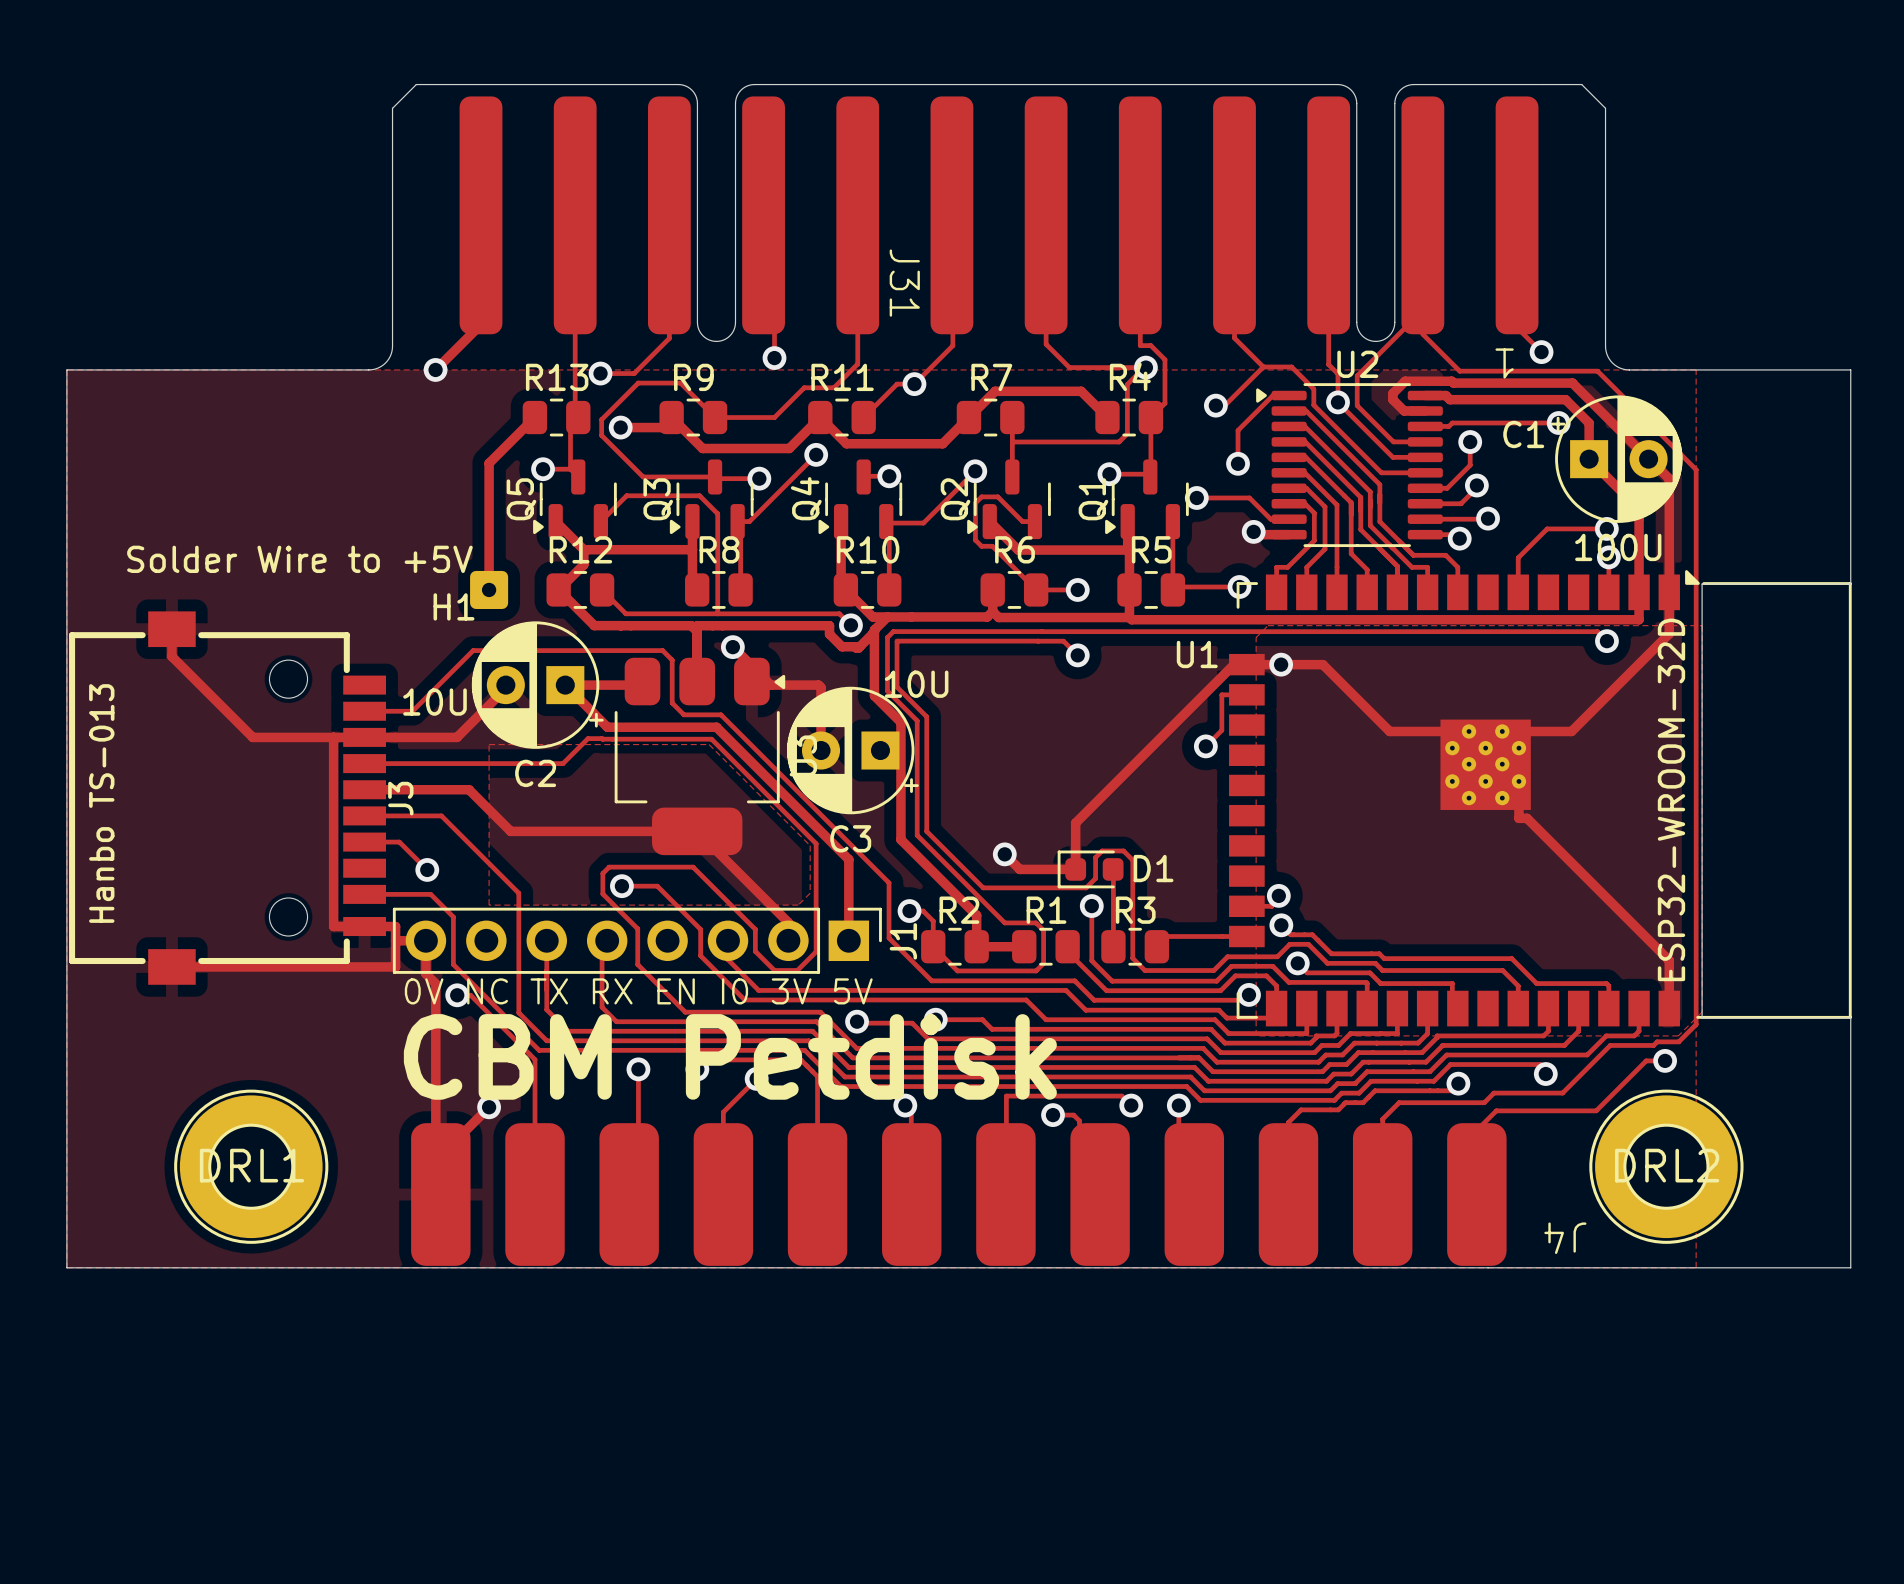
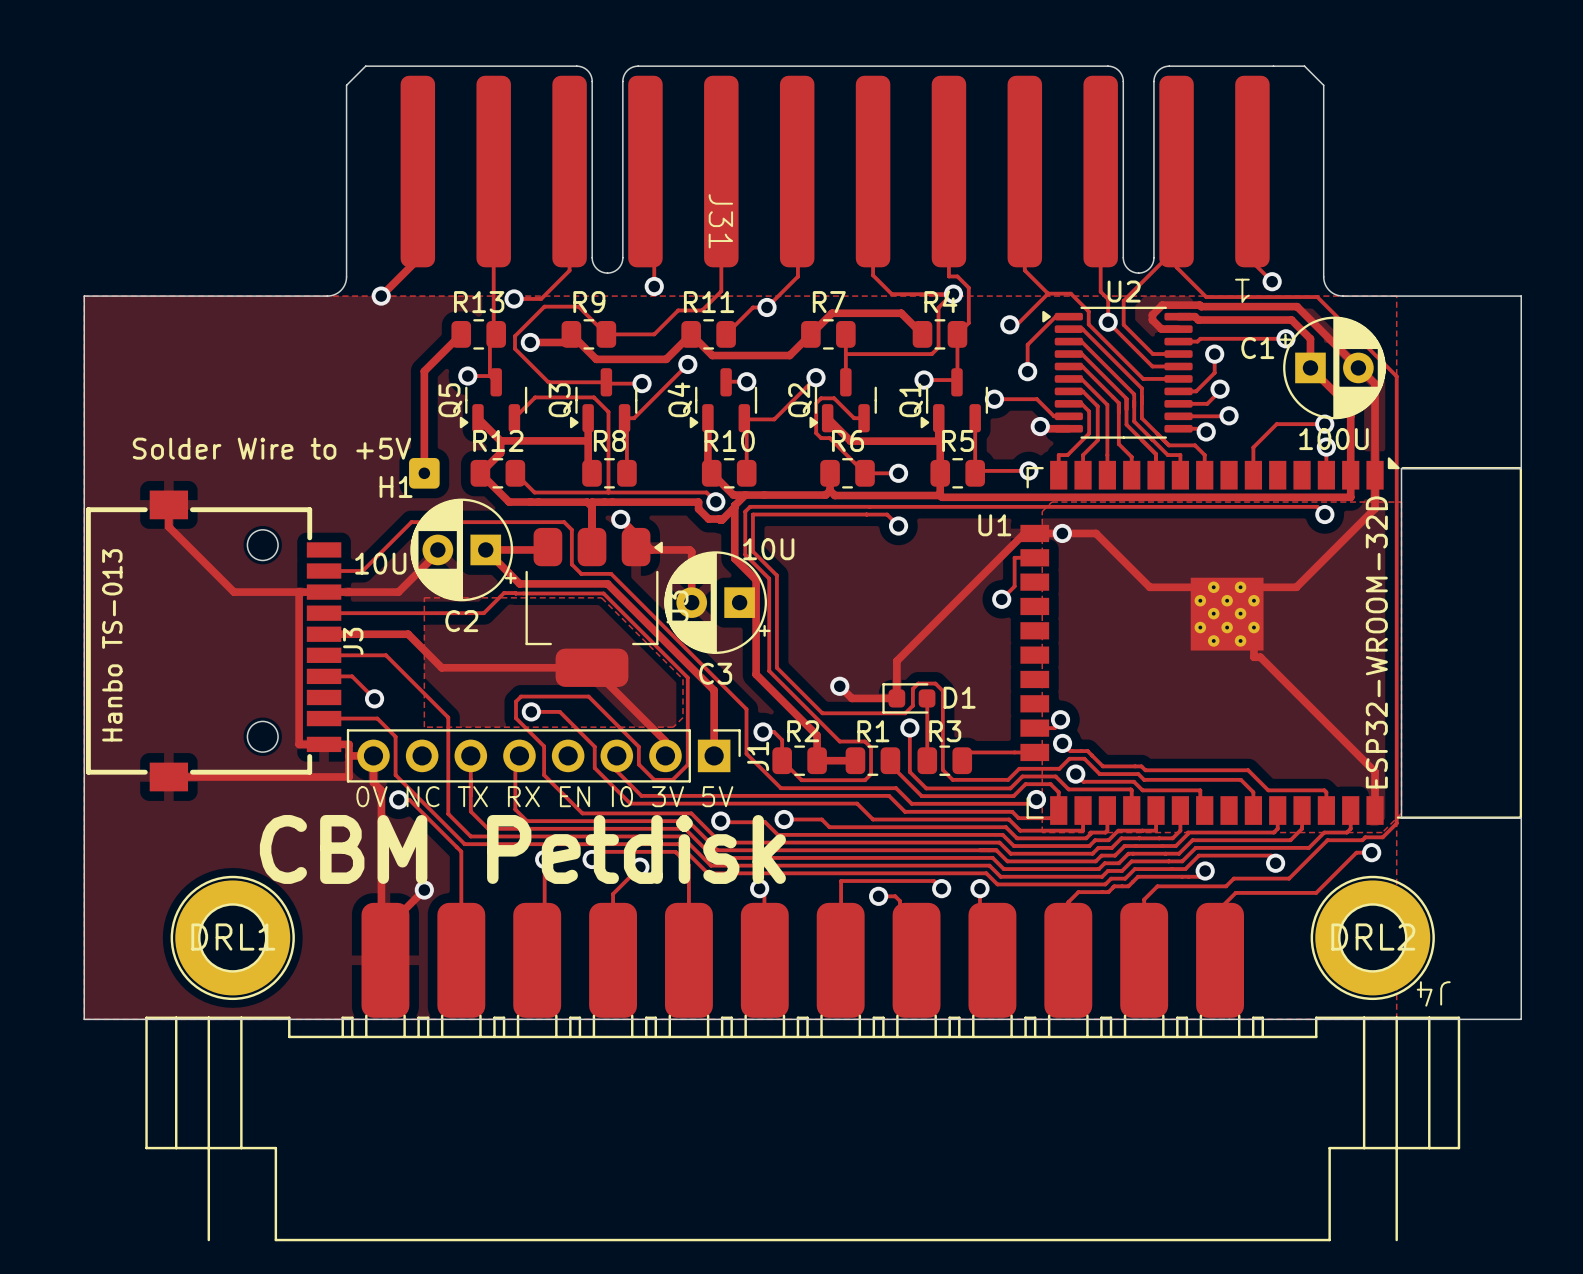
J31 name position: J31 (904, 283) -> J31 (720, 221)
text position: CBM Petdisk (730, 1056) -> CBM Petdisk (522, 849)
J4 footprint: [411, 1123, 1507, 1266] -> [145, 902, 1461, 1242]
J4 name position: J4 (1565, 1238) -> J4 (1433, 993)

